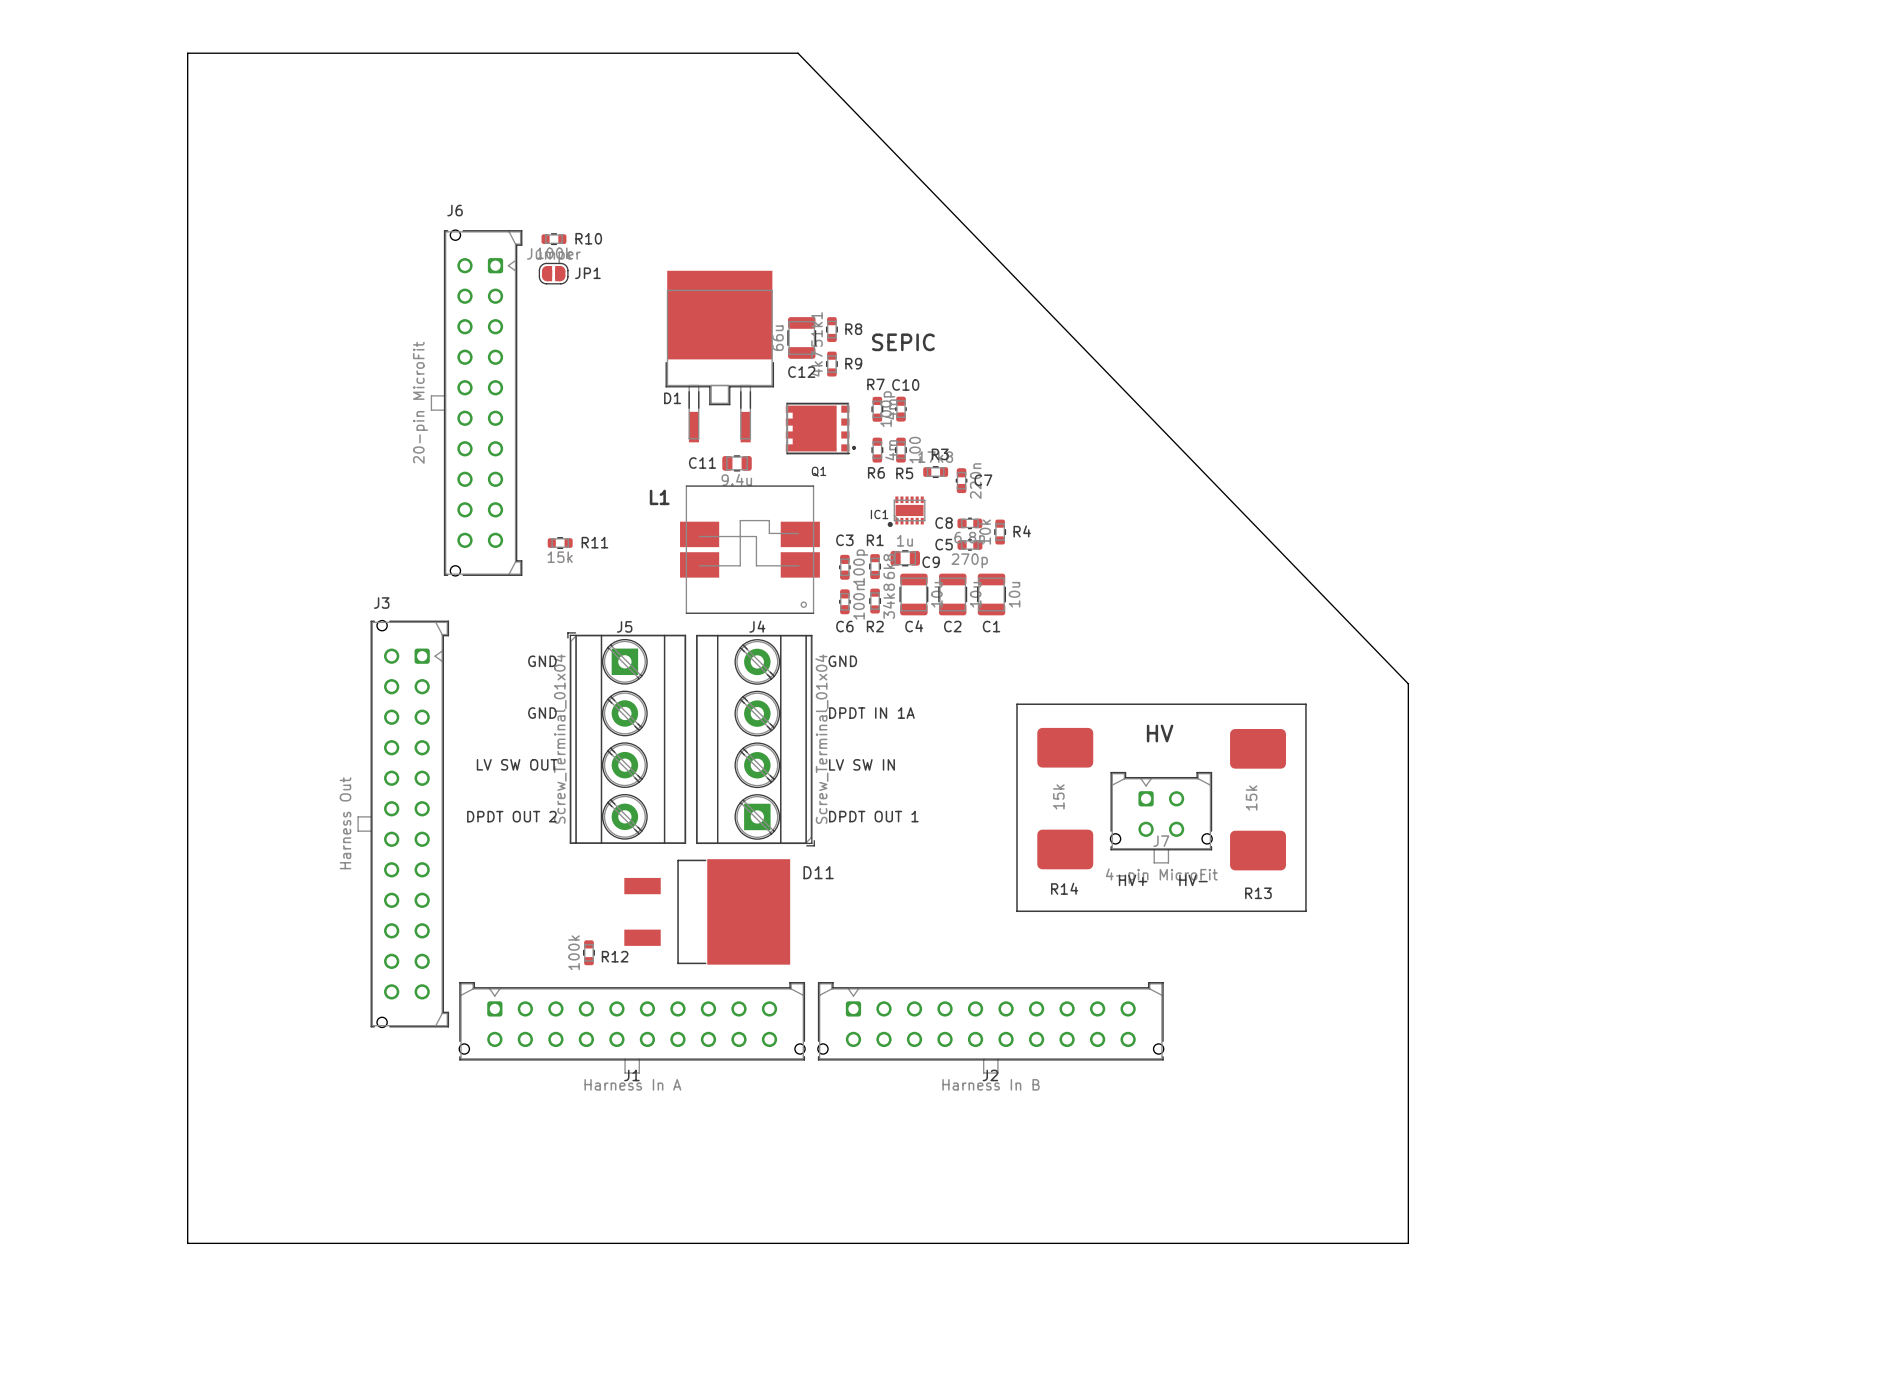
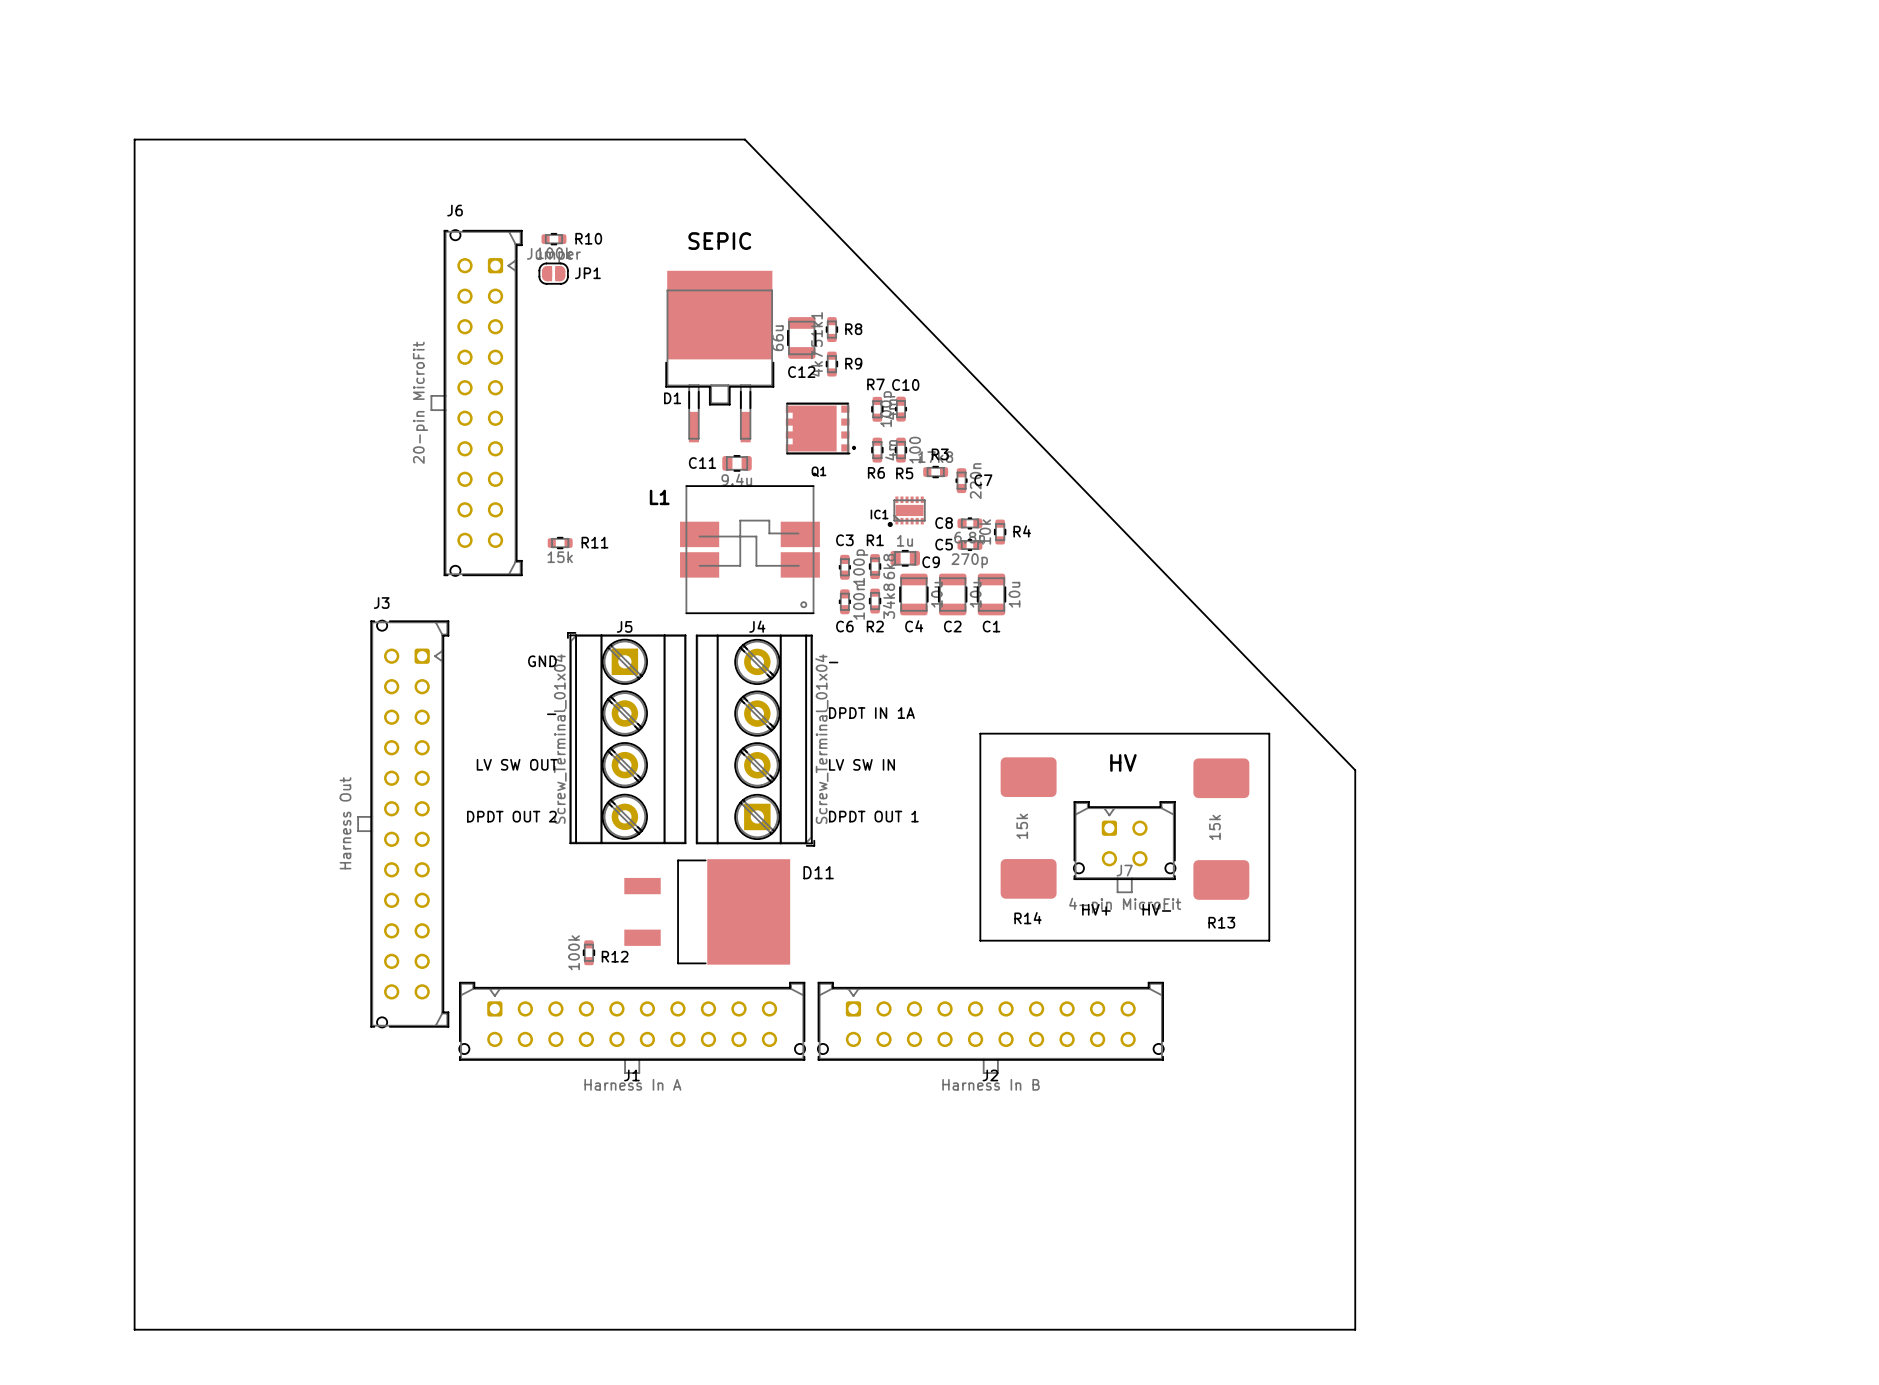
board edge: (187, 53) (187, 1243) (1408, 1243) (1408, 683) (798, 53) (187, 53) -> (134, 139) (134, 1329) (1355, 1329) (1355, 770) (744, 139) (134, 139)
text position: SEPIC (903, 342) -> SEPIC (719, 241)
text: GND (842, 661) -> - (833, 662)
line: (1017, 704) (1305, 704) (1305, 911) (1017, 911) (1017, 704) -> (980, 733) (980, 940) (1269, 940) (1269, 733) (980, 733)
text: GND (542, 713) -> - (551, 714)
text position: HV (1160, 733) -> HV (1123, 762)
R14 position: (1065, 798) -> (1028, 828)
R13 position: (1258, 799) -> (1221, 829)
J7 position: (1161, 817) -> (1124, 847)
text position: HV+ (1133, 880) -> HV+ (1096, 909)
text position: HV- (1193, 880) -> HV- (1156, 909)

